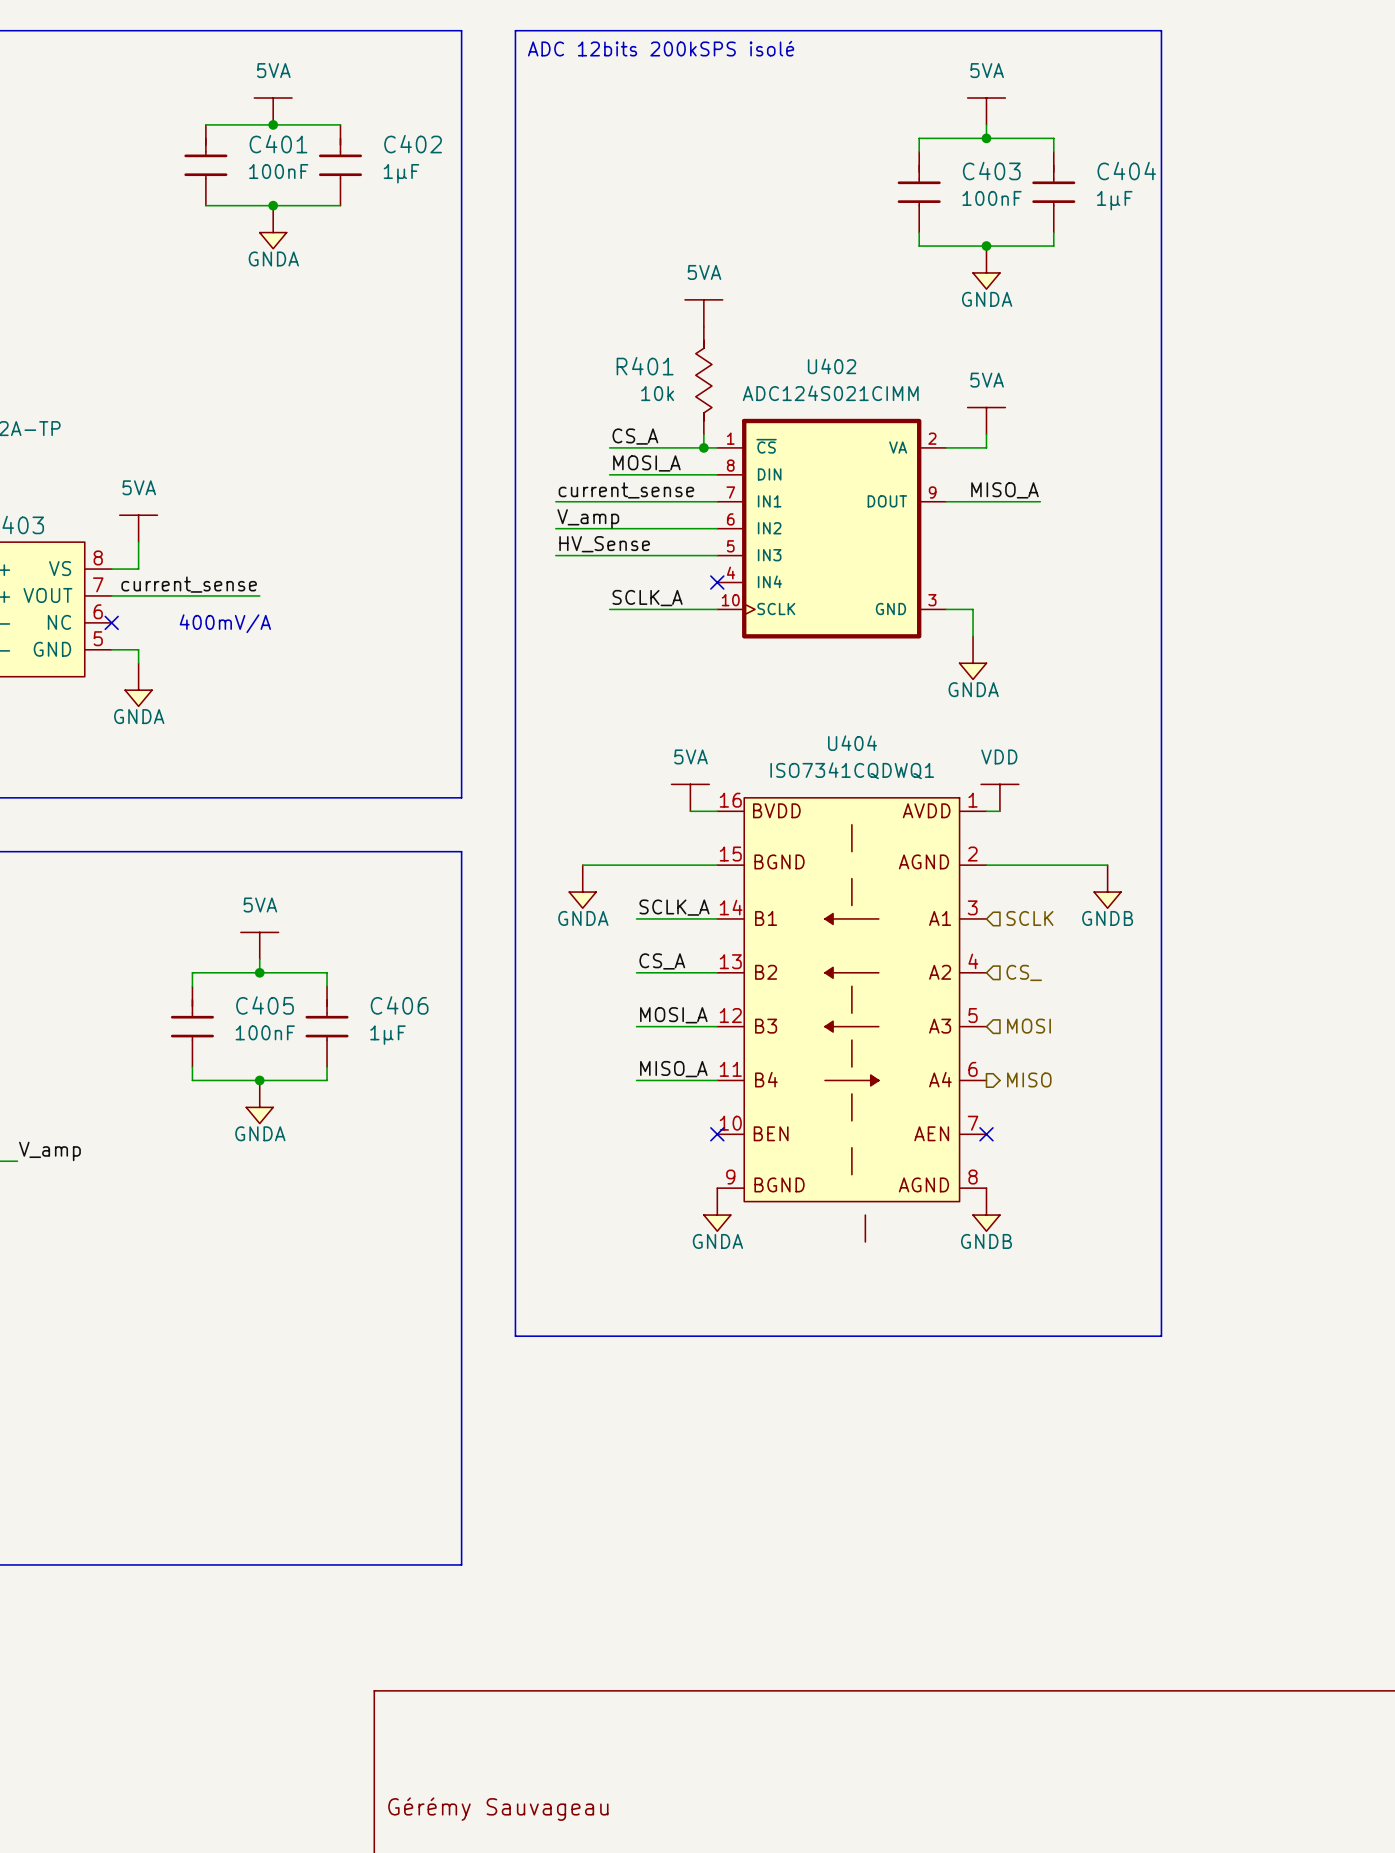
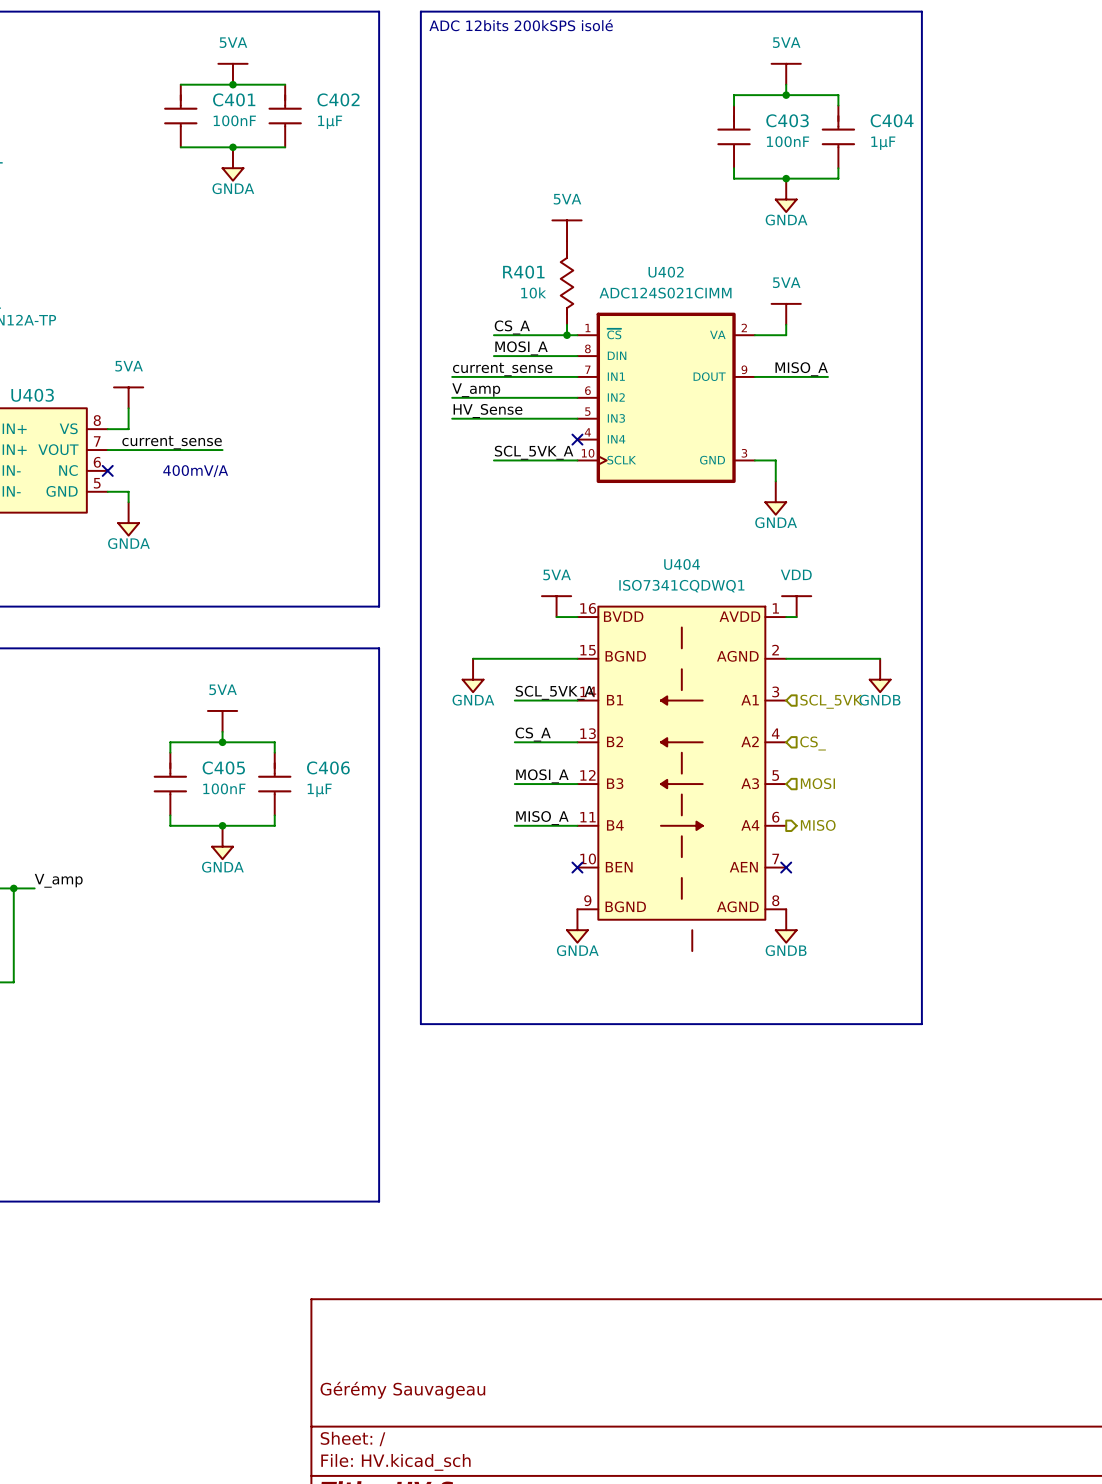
label: SCLK_A (647, 598) -> SCL_5VK_A (534, 452)
label: SCLK_A (674, 907) -> SCL_5VK_A (554, 692)
hierarchical label: SCLK (1029, 918) -> SCL_5VK (831, 701)

